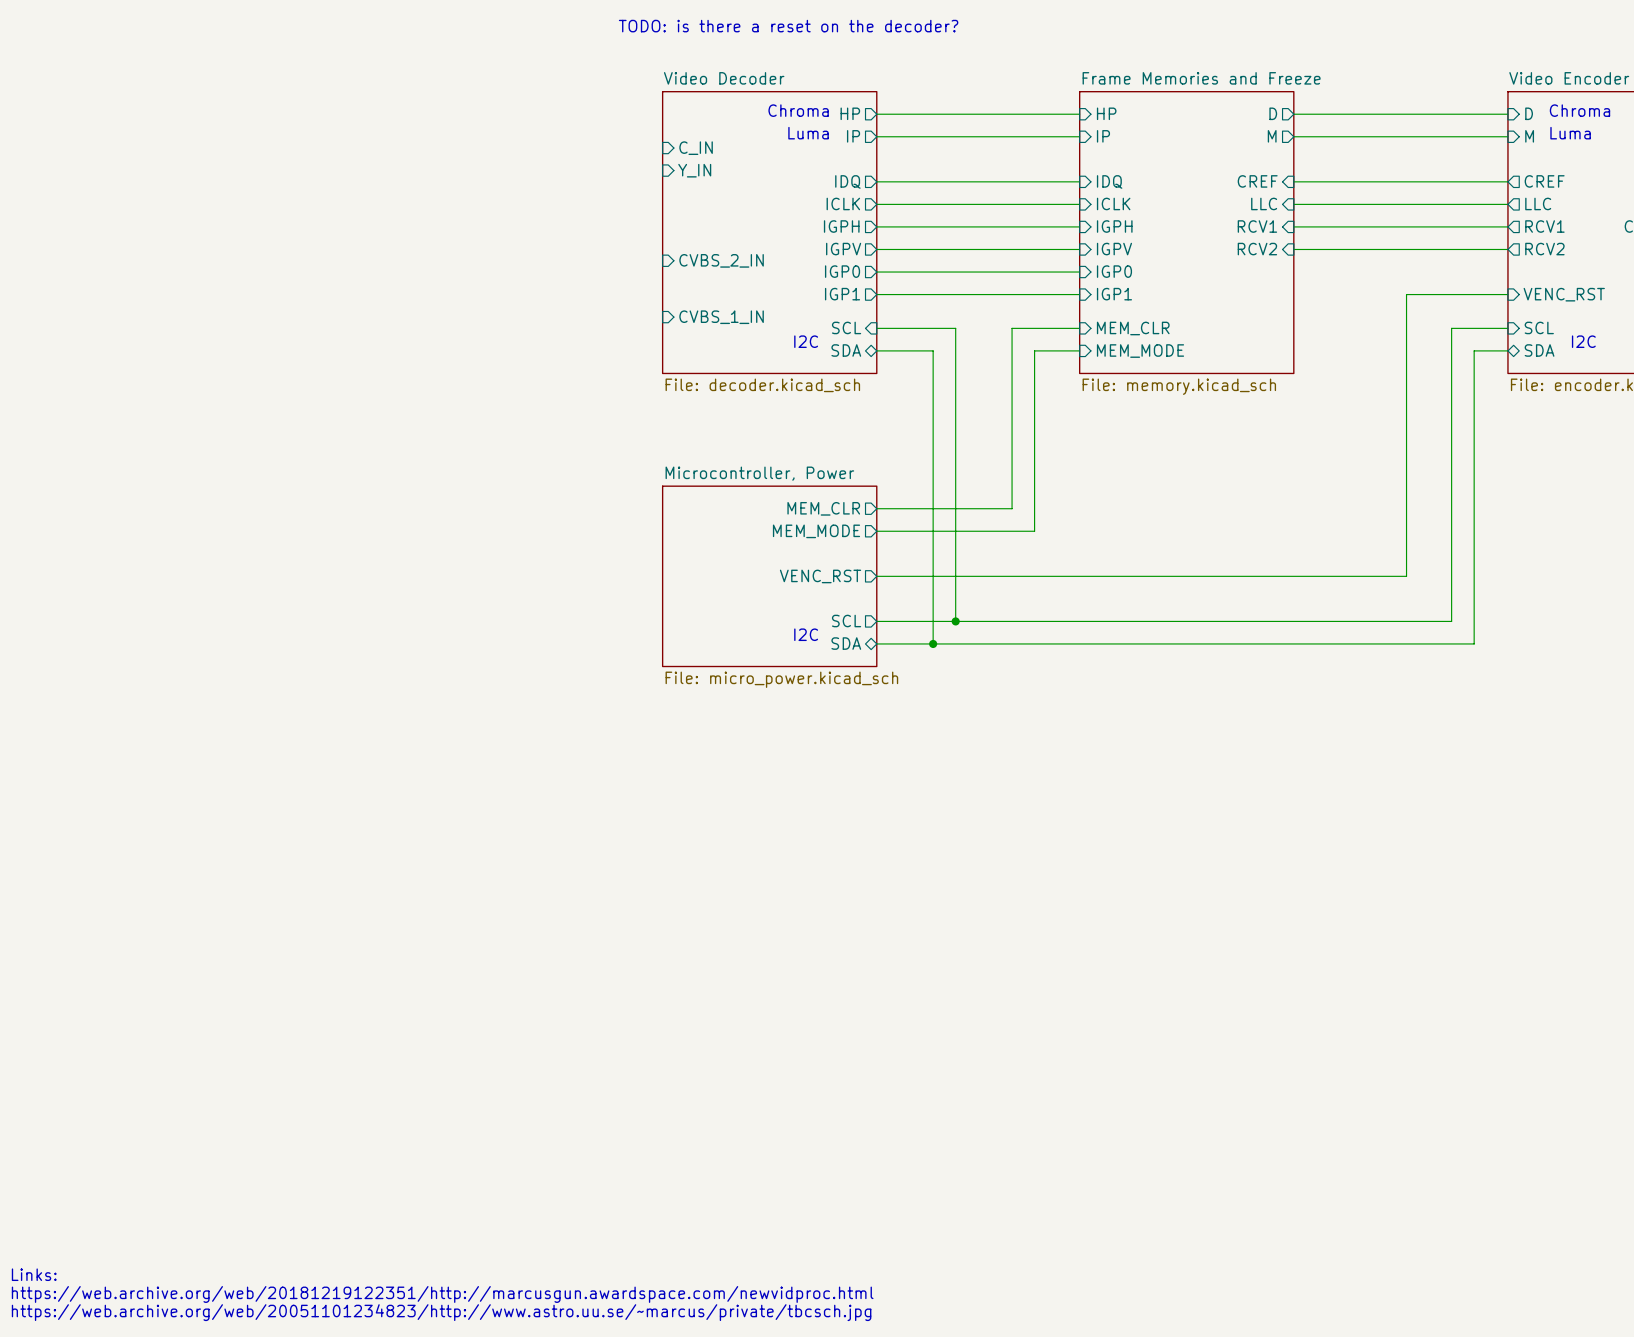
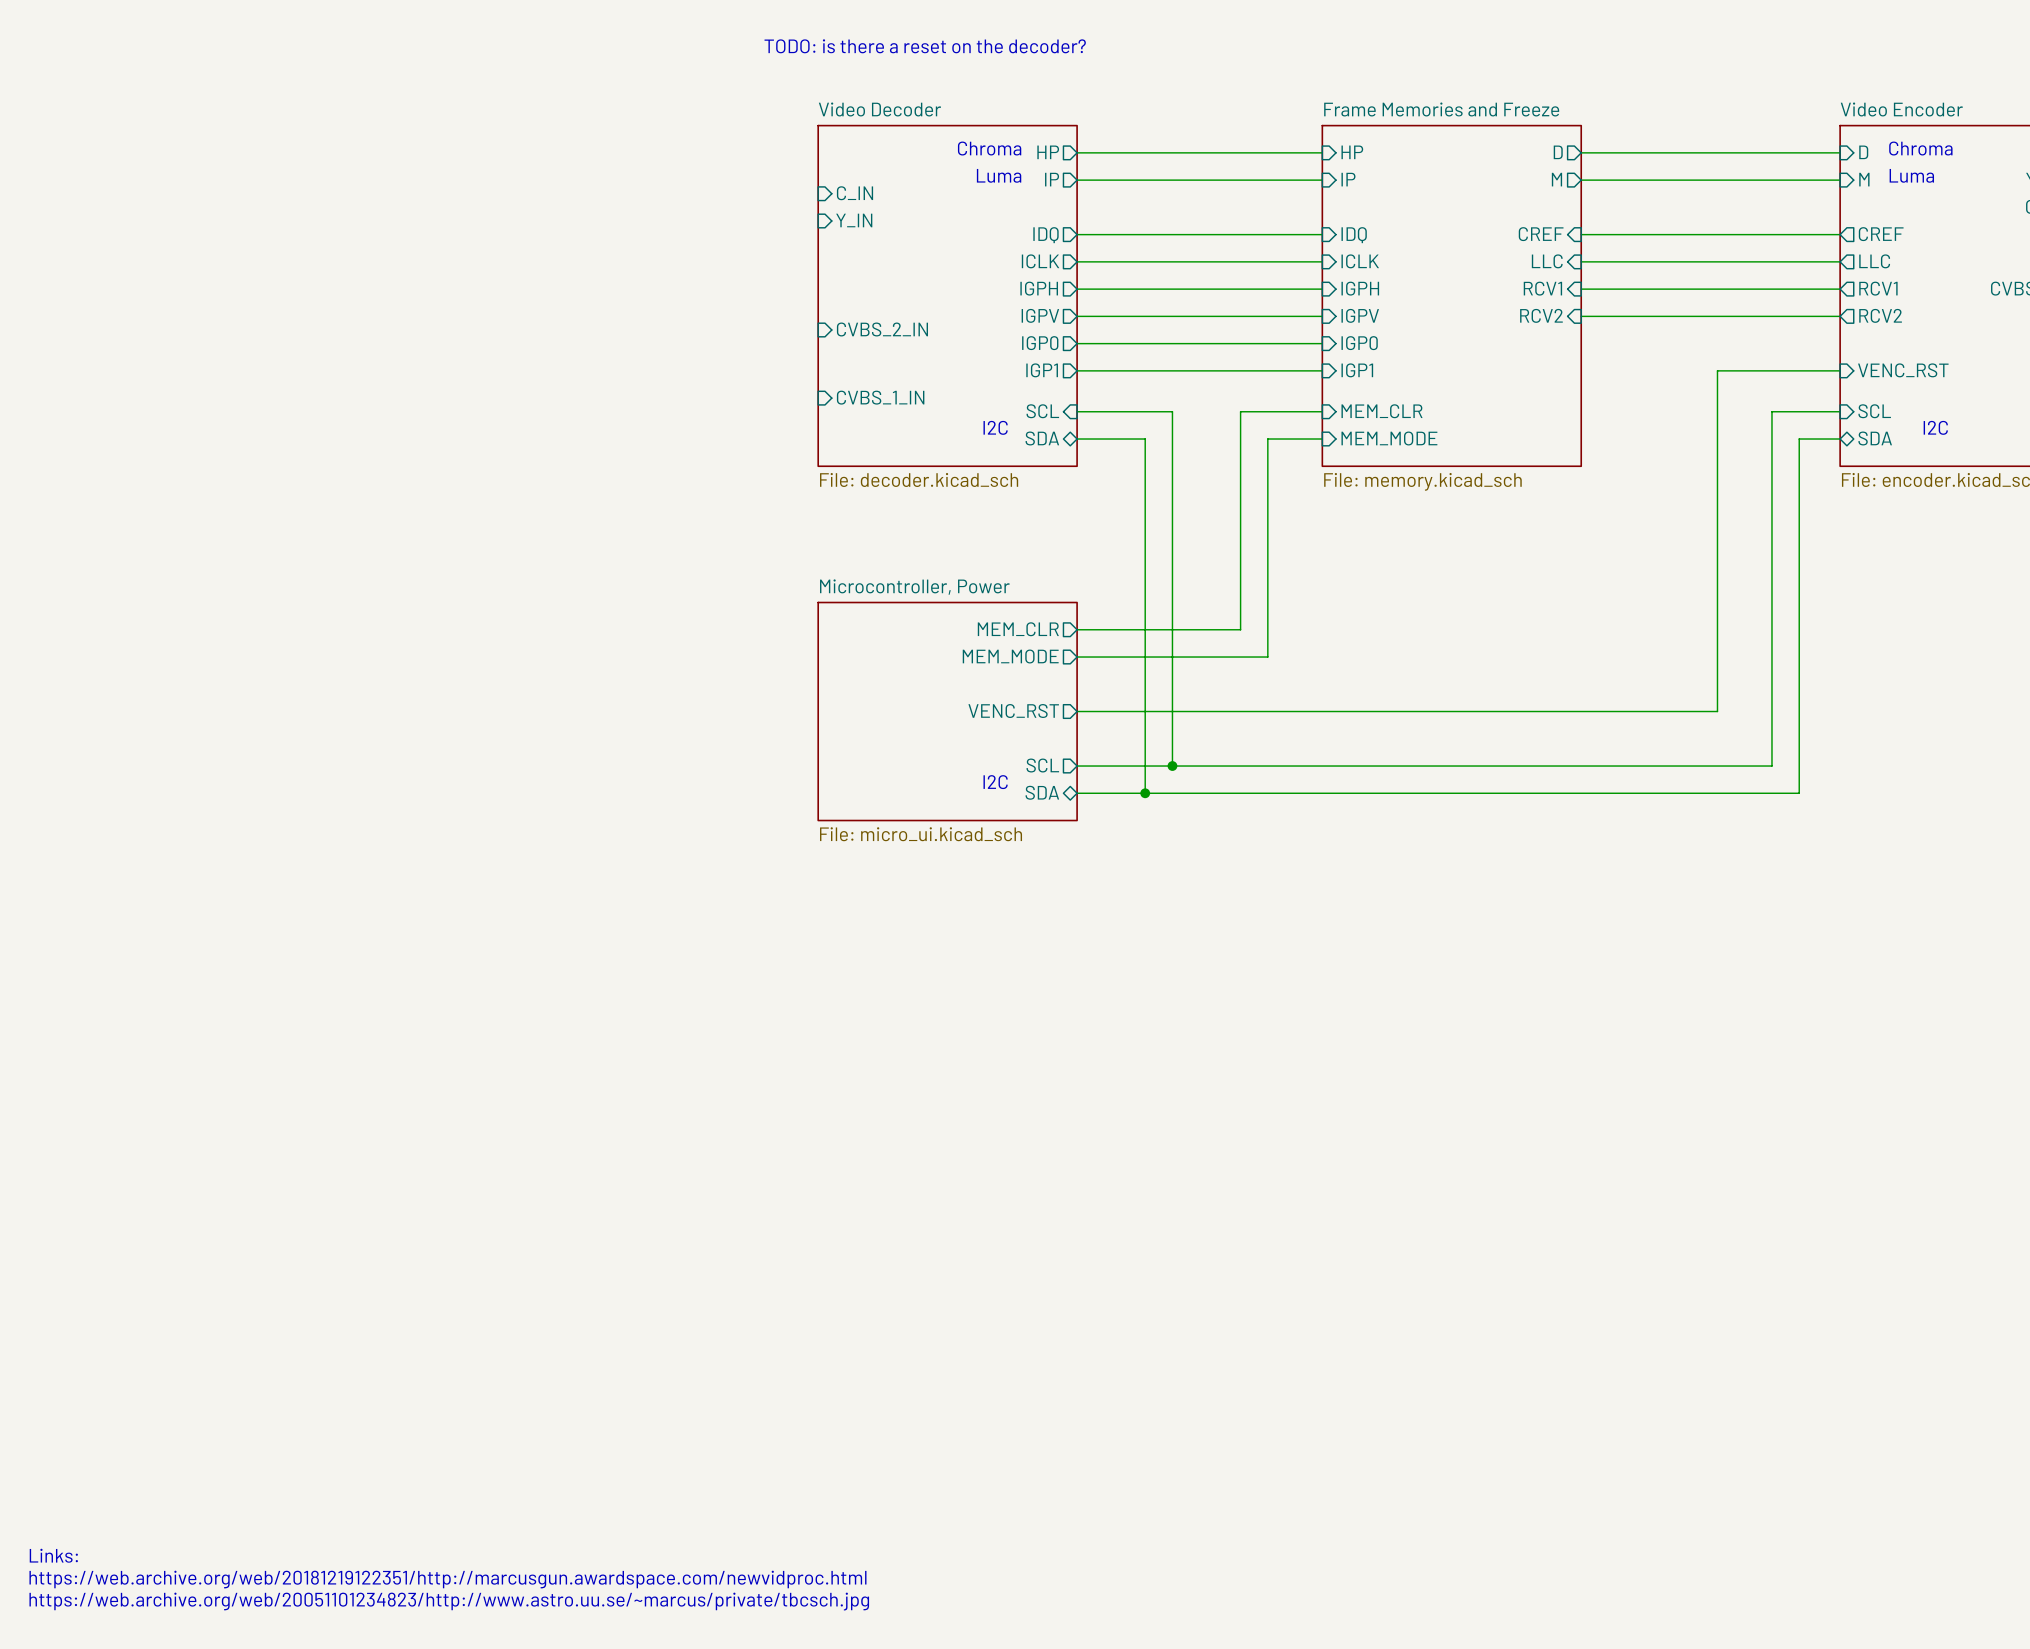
sheet Microcontroller, Power value: File: micro_power.kicad_sch (781, 679) -> File: micro_ui.kicad_sch (921, 834)

